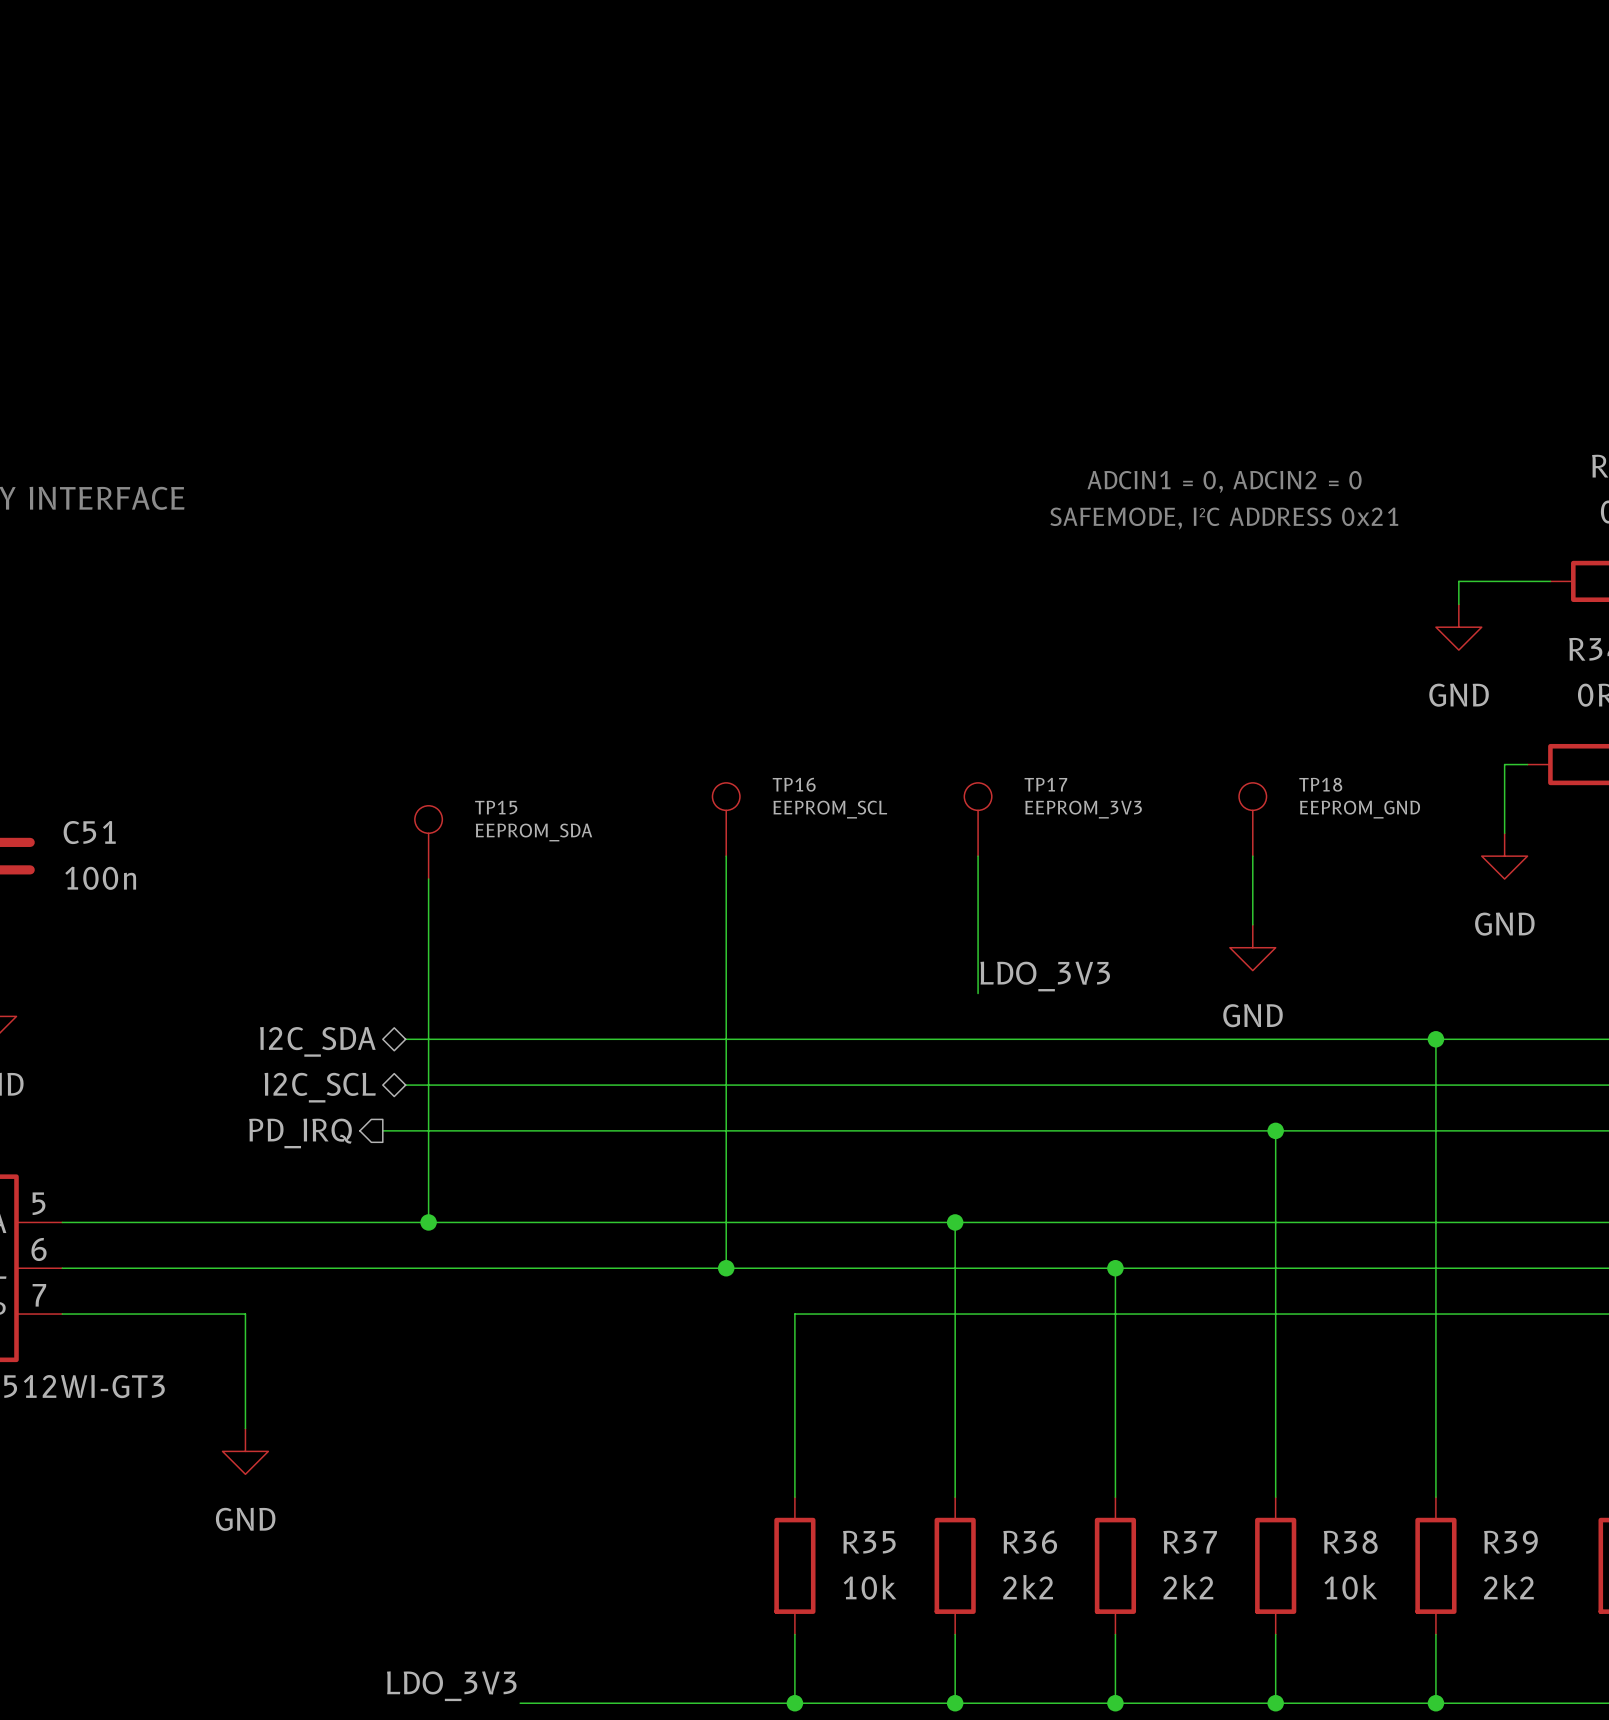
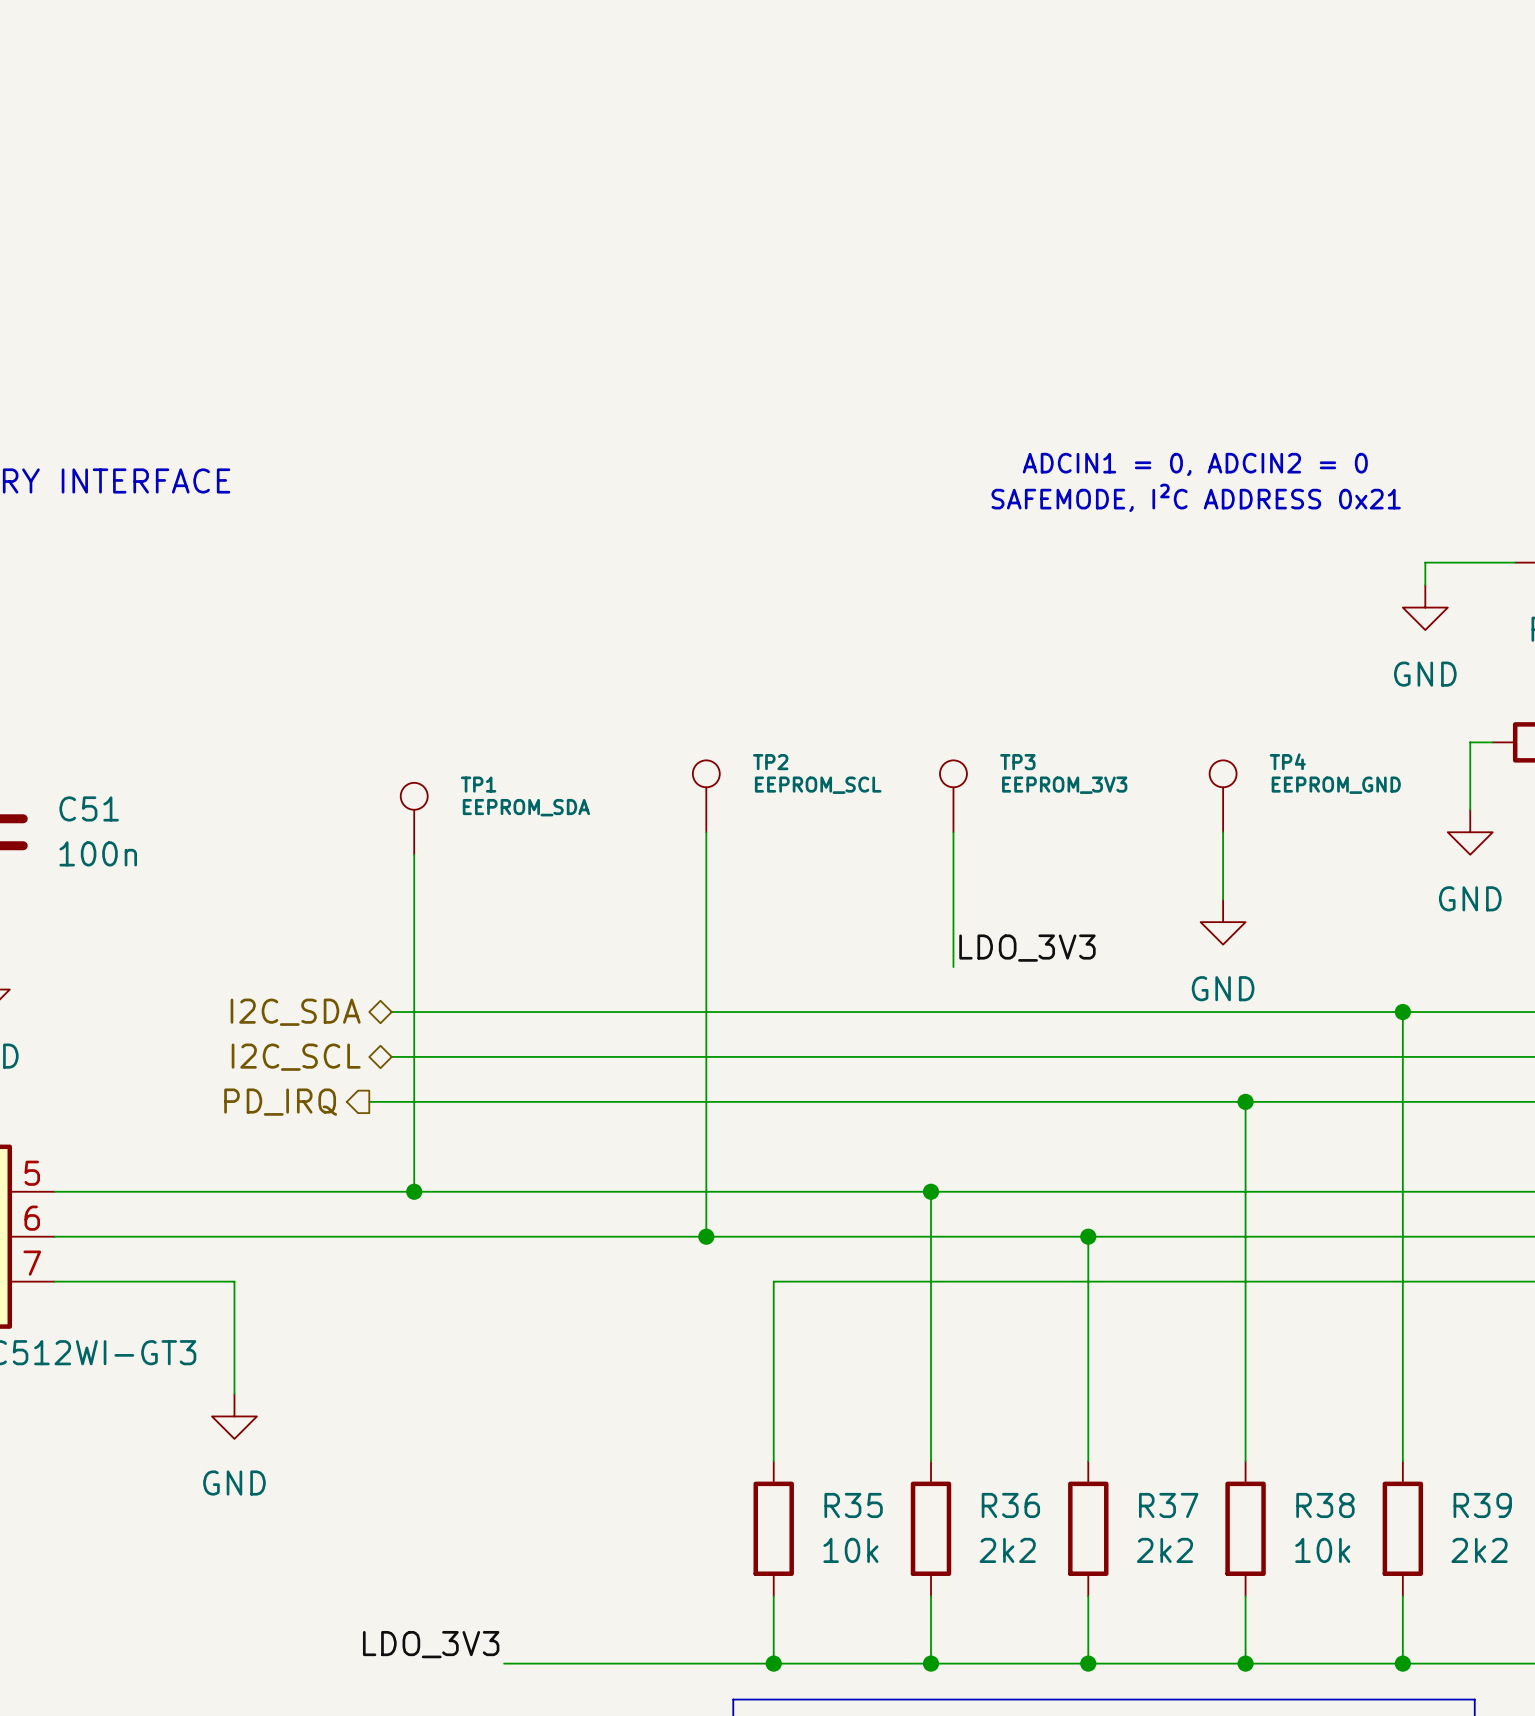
TP16 name: TP16 (794, 784) -> TP2 (770, 762)
TP17 name: TP17 (1045, 784) -> TP3 (1017, 762)
TP18 name: TP18 (1320, 784) -> TP4 (1287, 761)
TP15 name: TP15 (496, 807) -> TP1 (478, 784)

